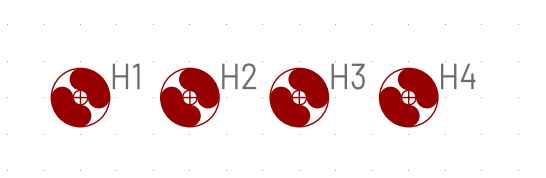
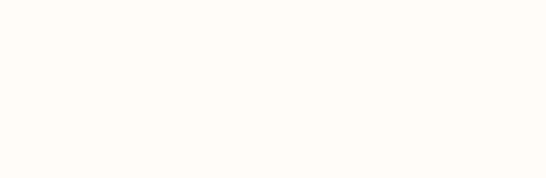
H1: (80, 97) -> none
H2: (189, 97) -> none
H3: (299, 97) -> none
H4: (408, 97) -> none

